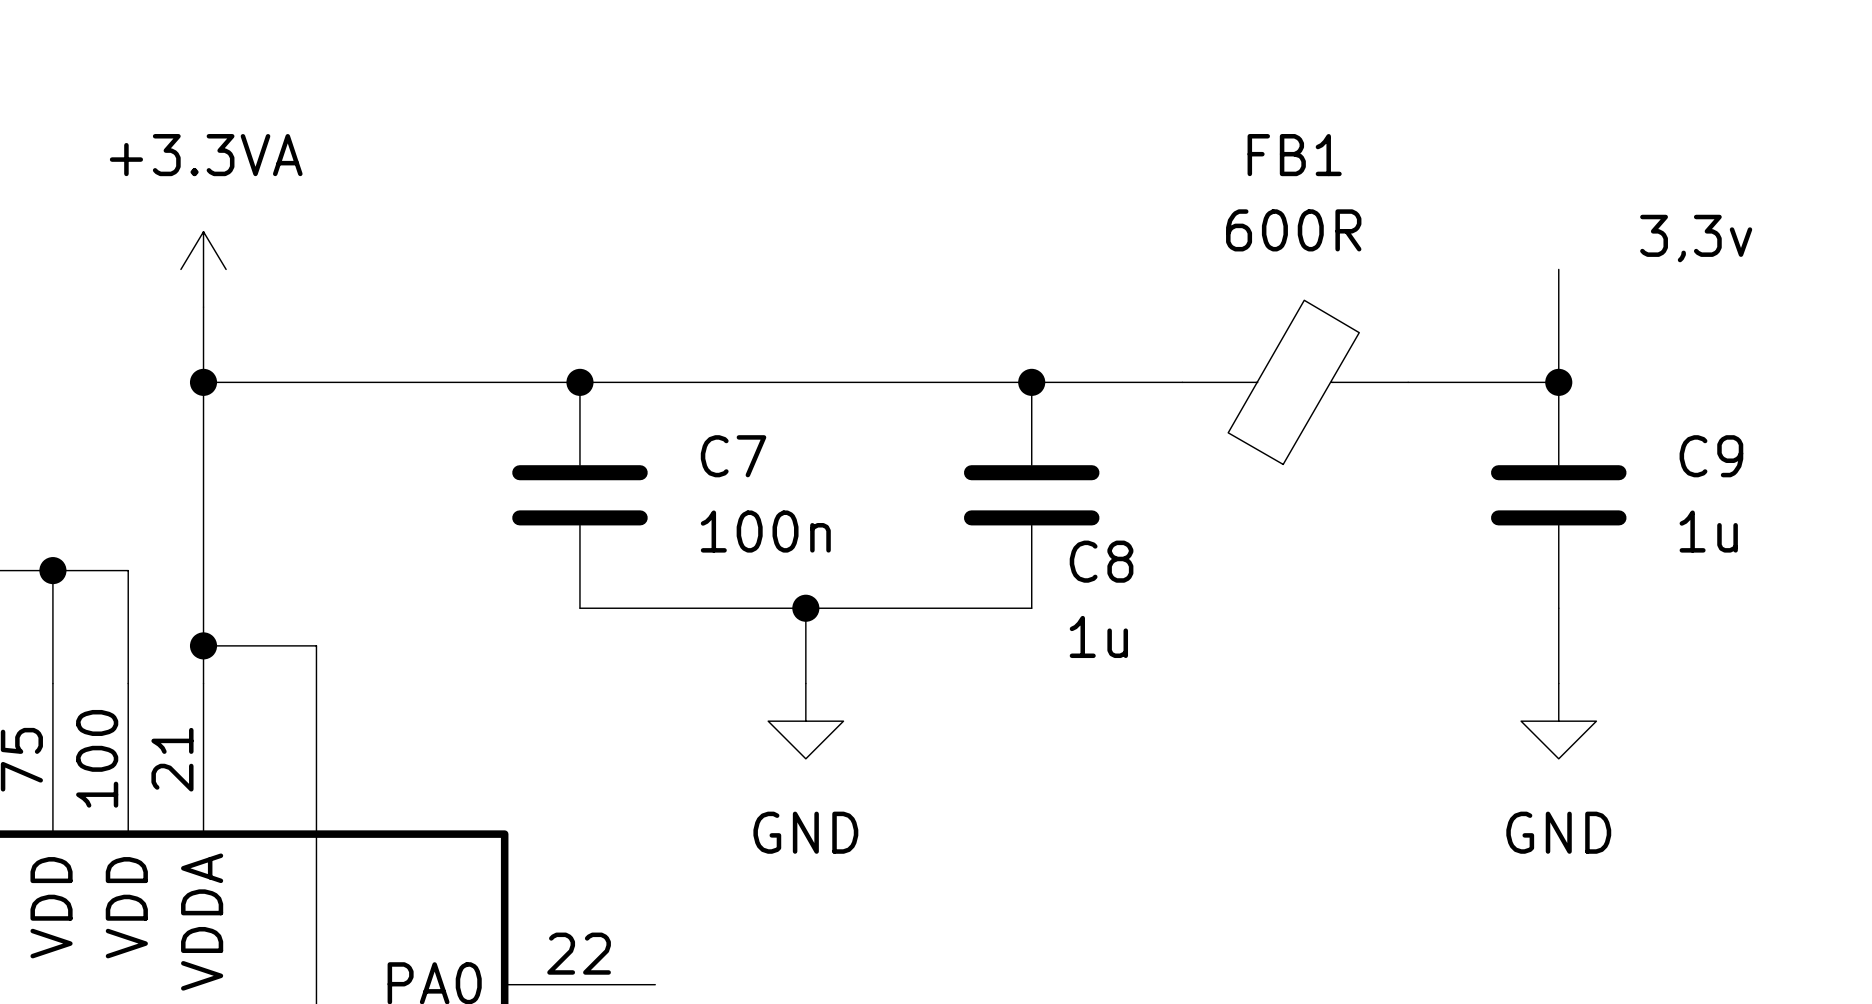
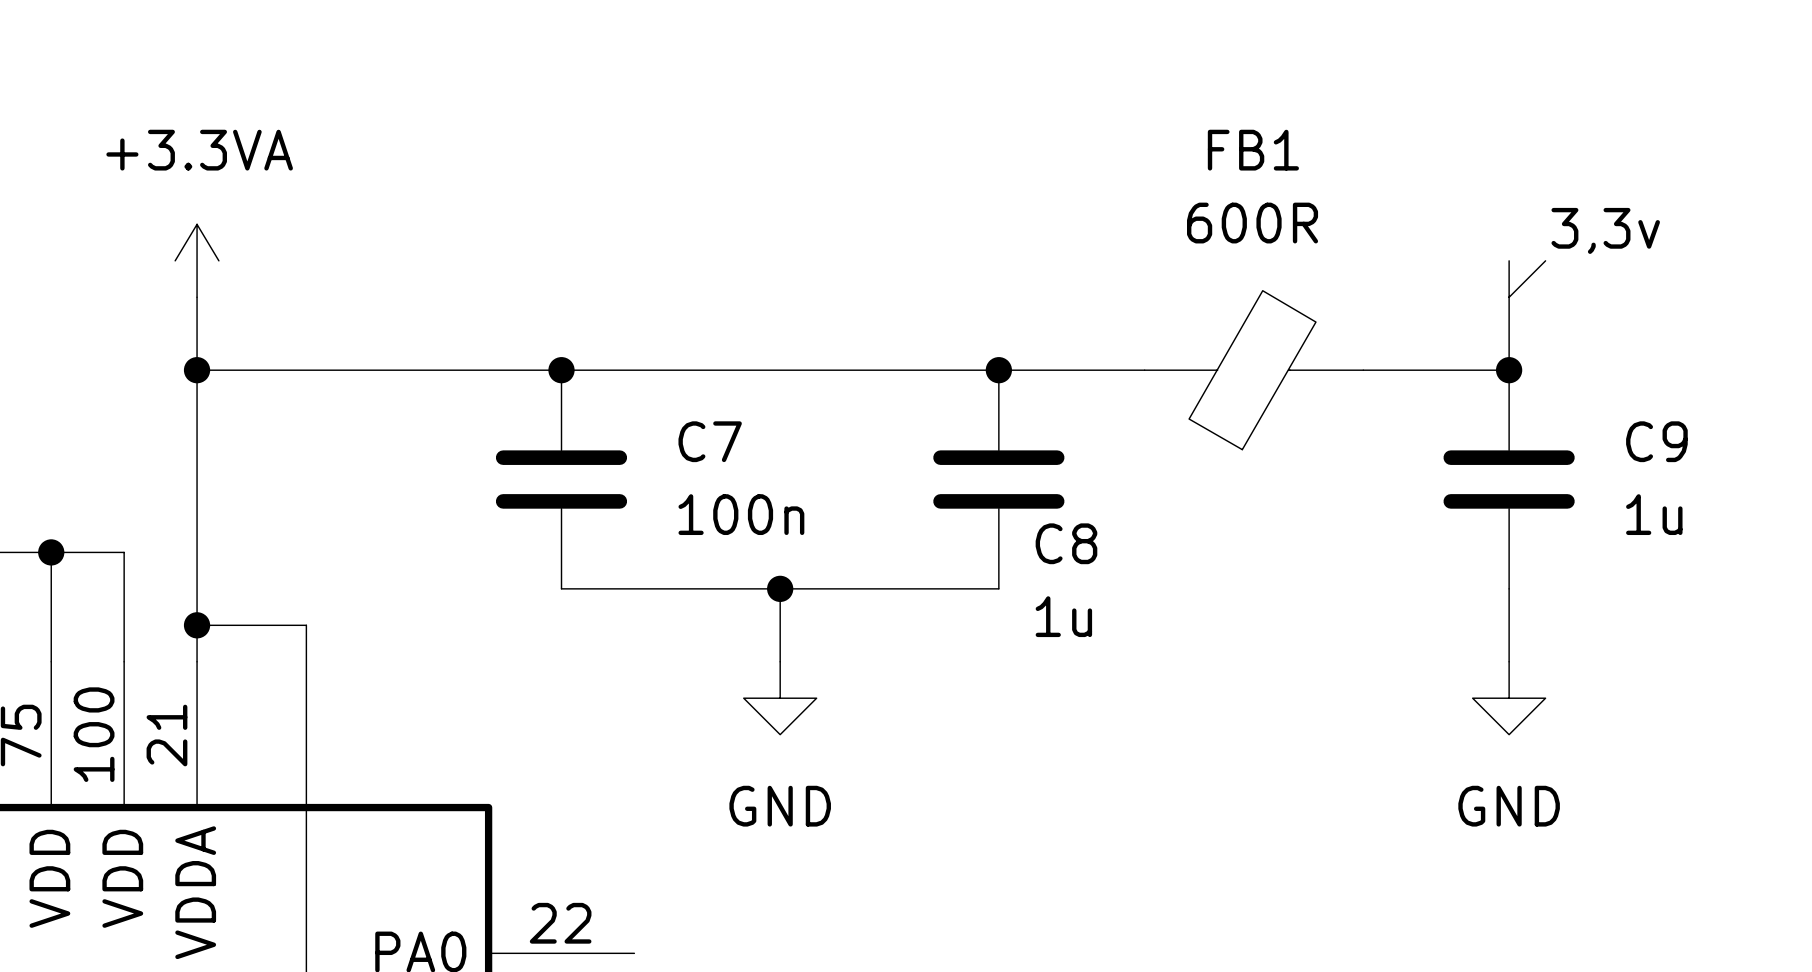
label position: 3,3v (1696, 238) -> 3,3v (1605, 230)
wire: none -> (1545, 260) (1509, 297)

